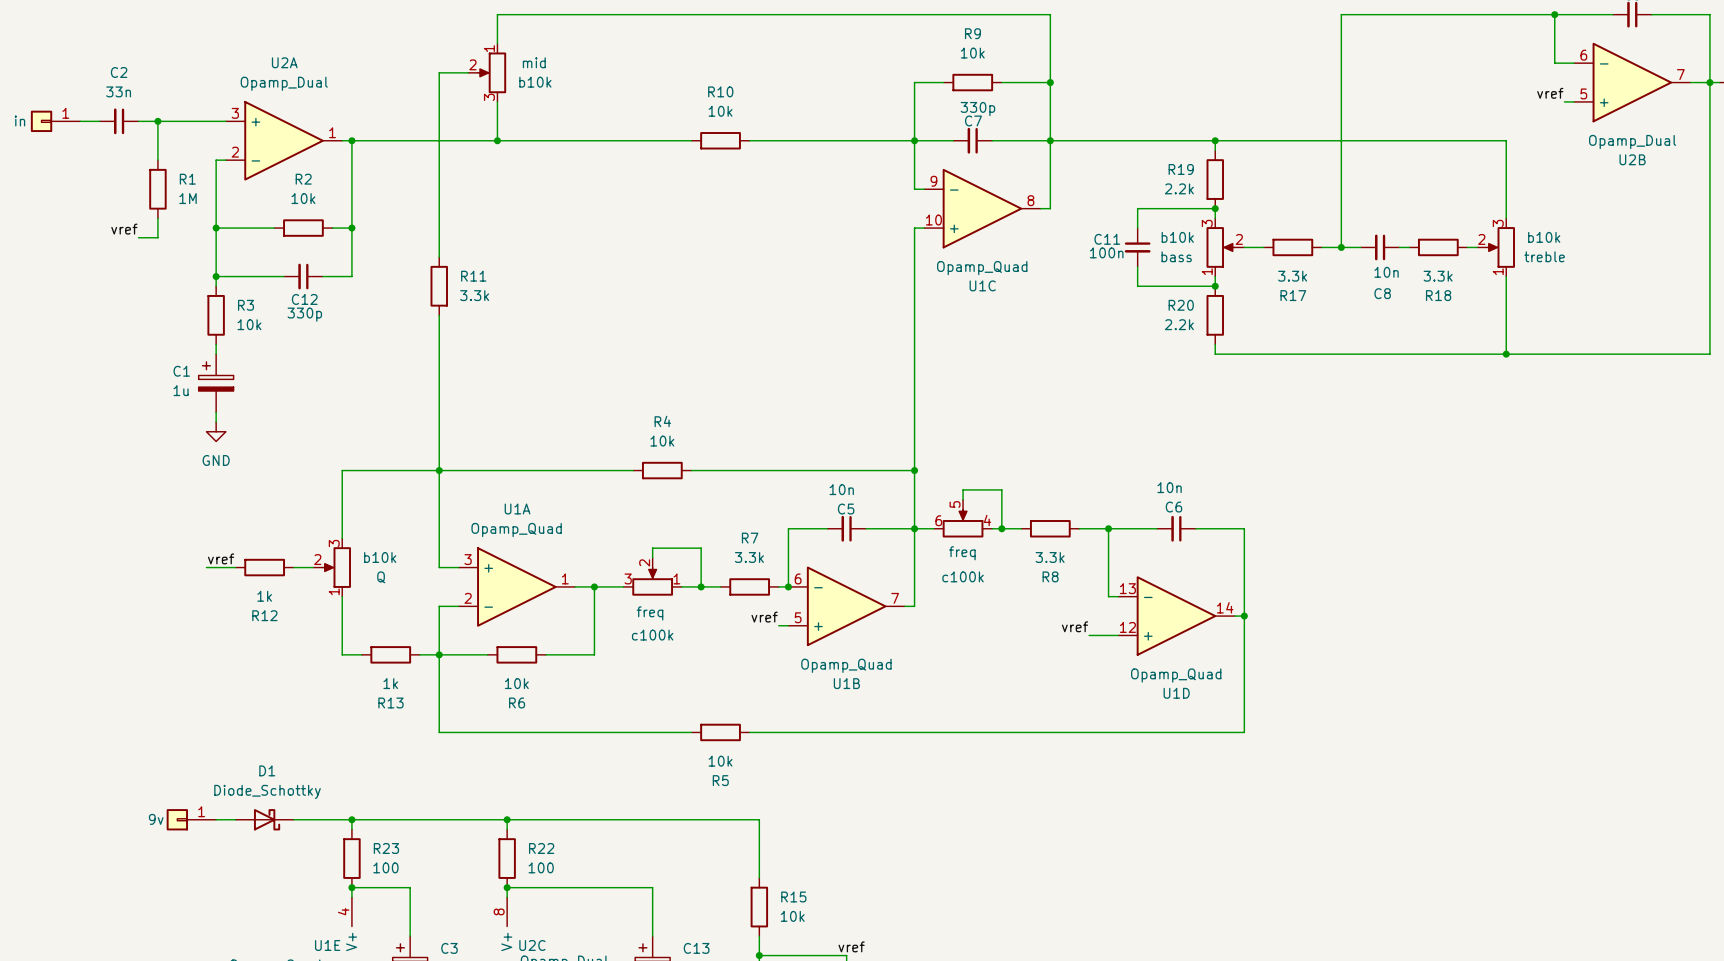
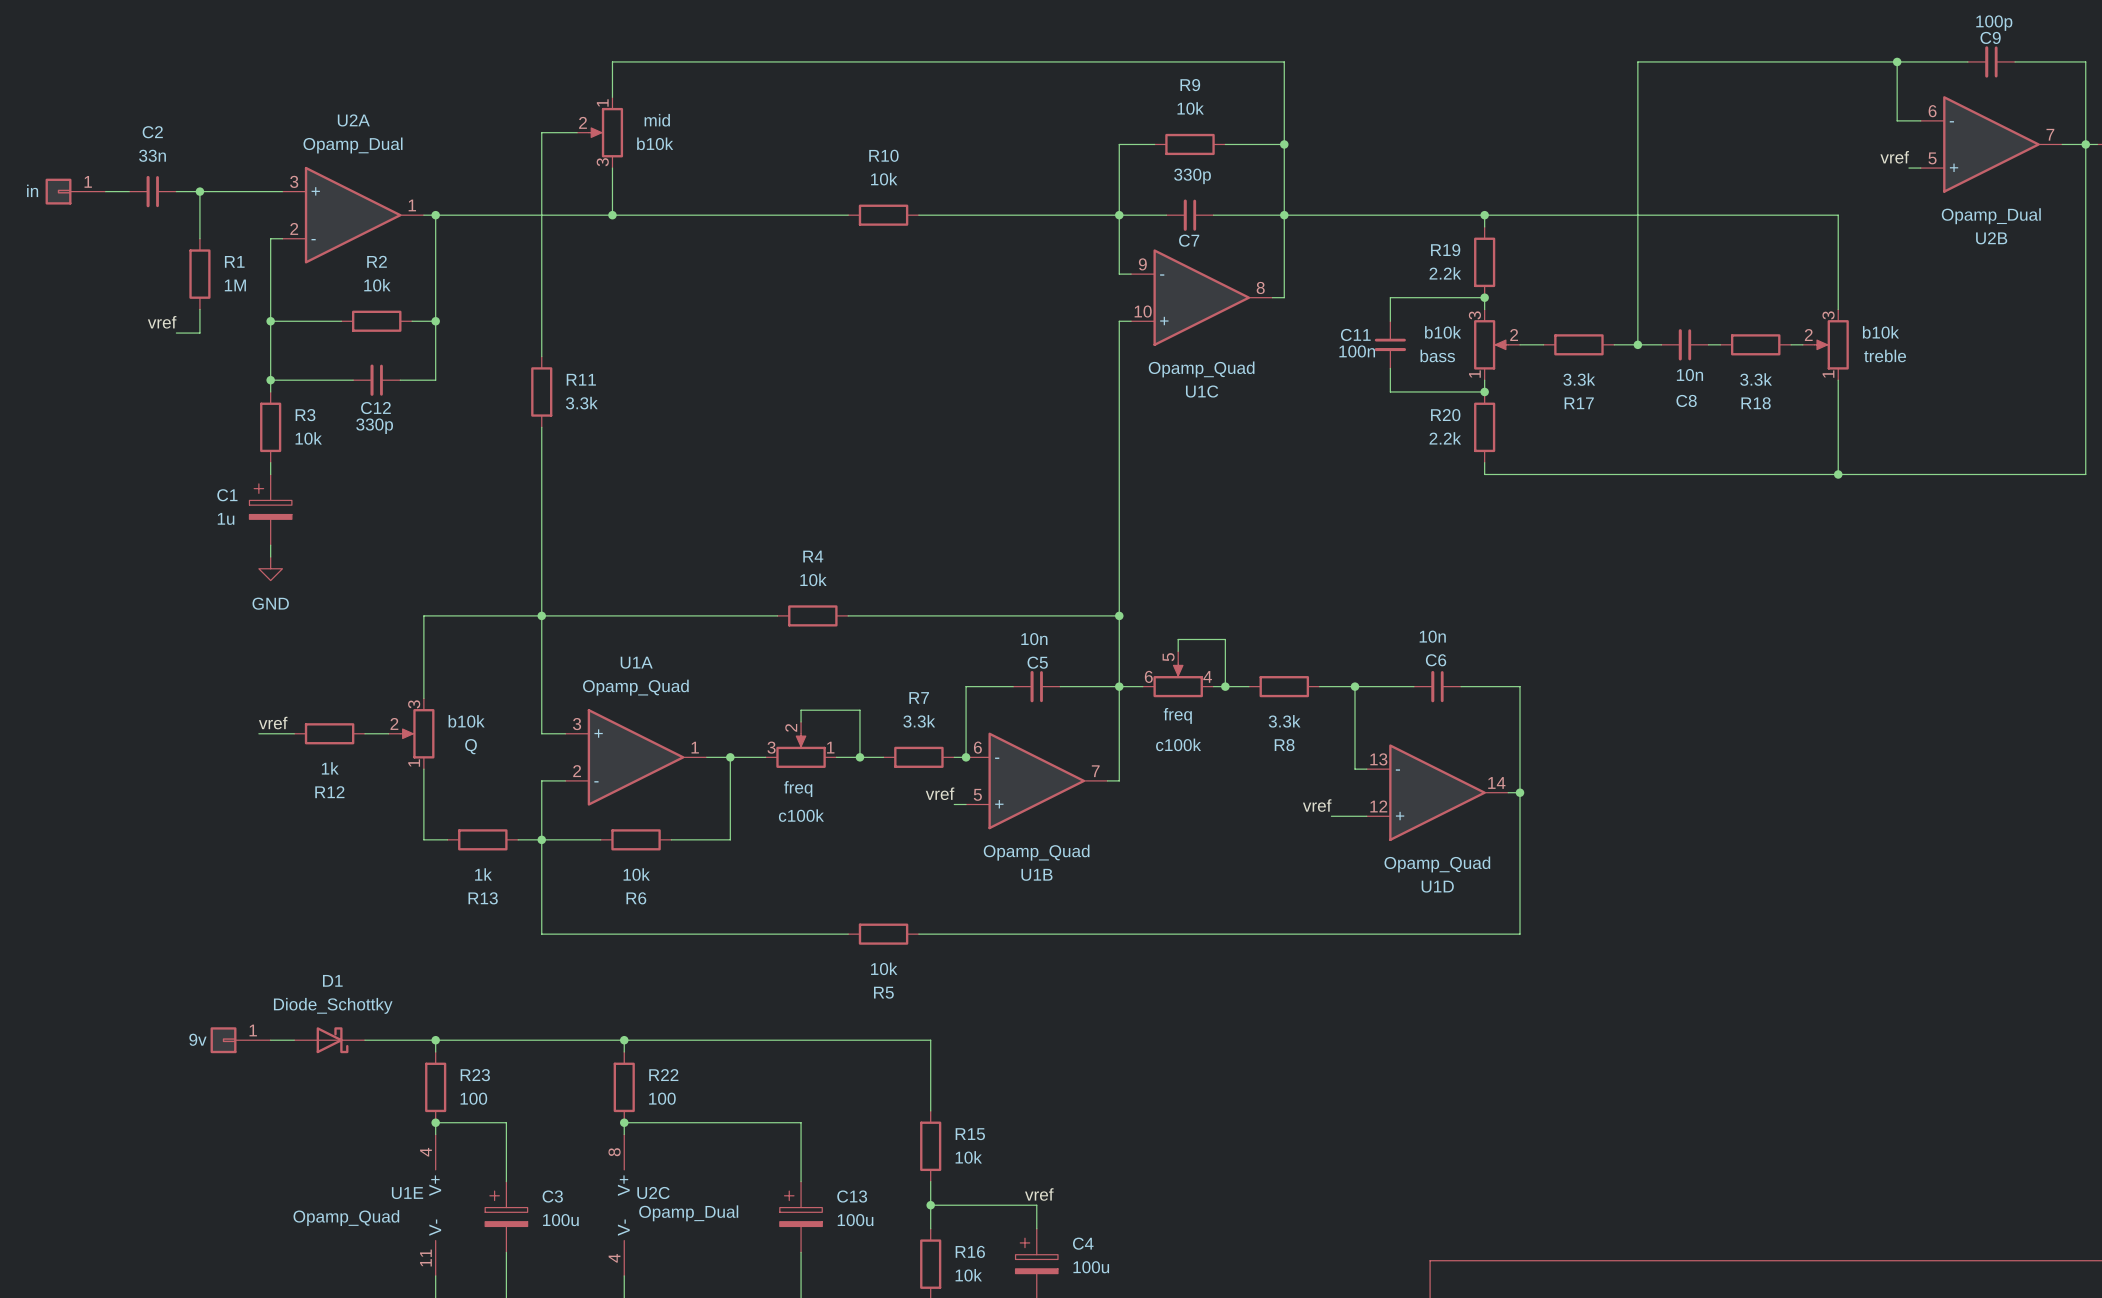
C7 name position: C7 (973, 120) -> C7 (1189, 240)

